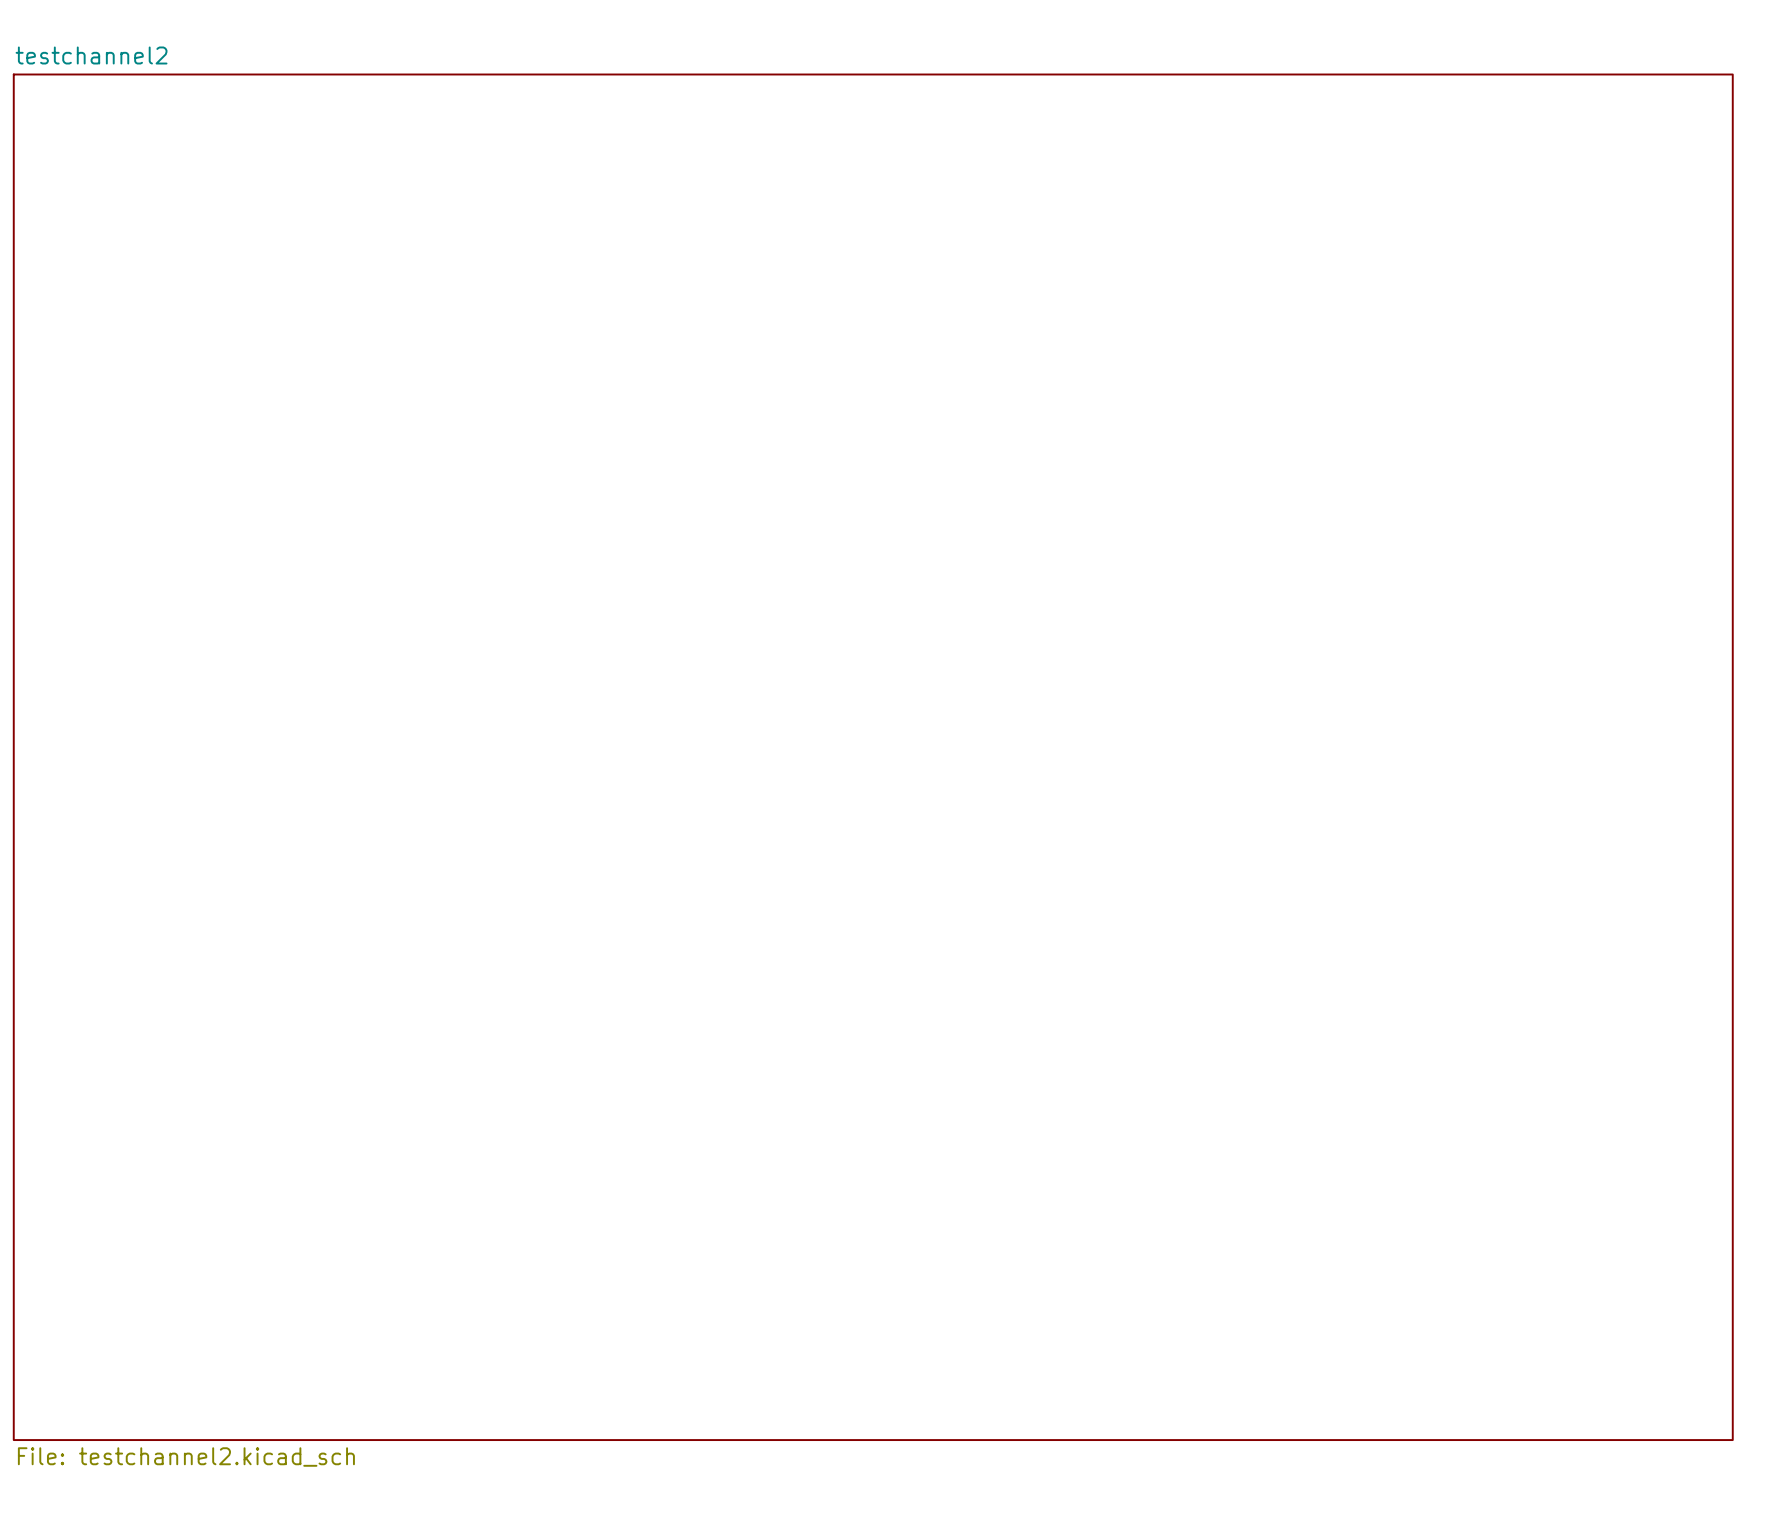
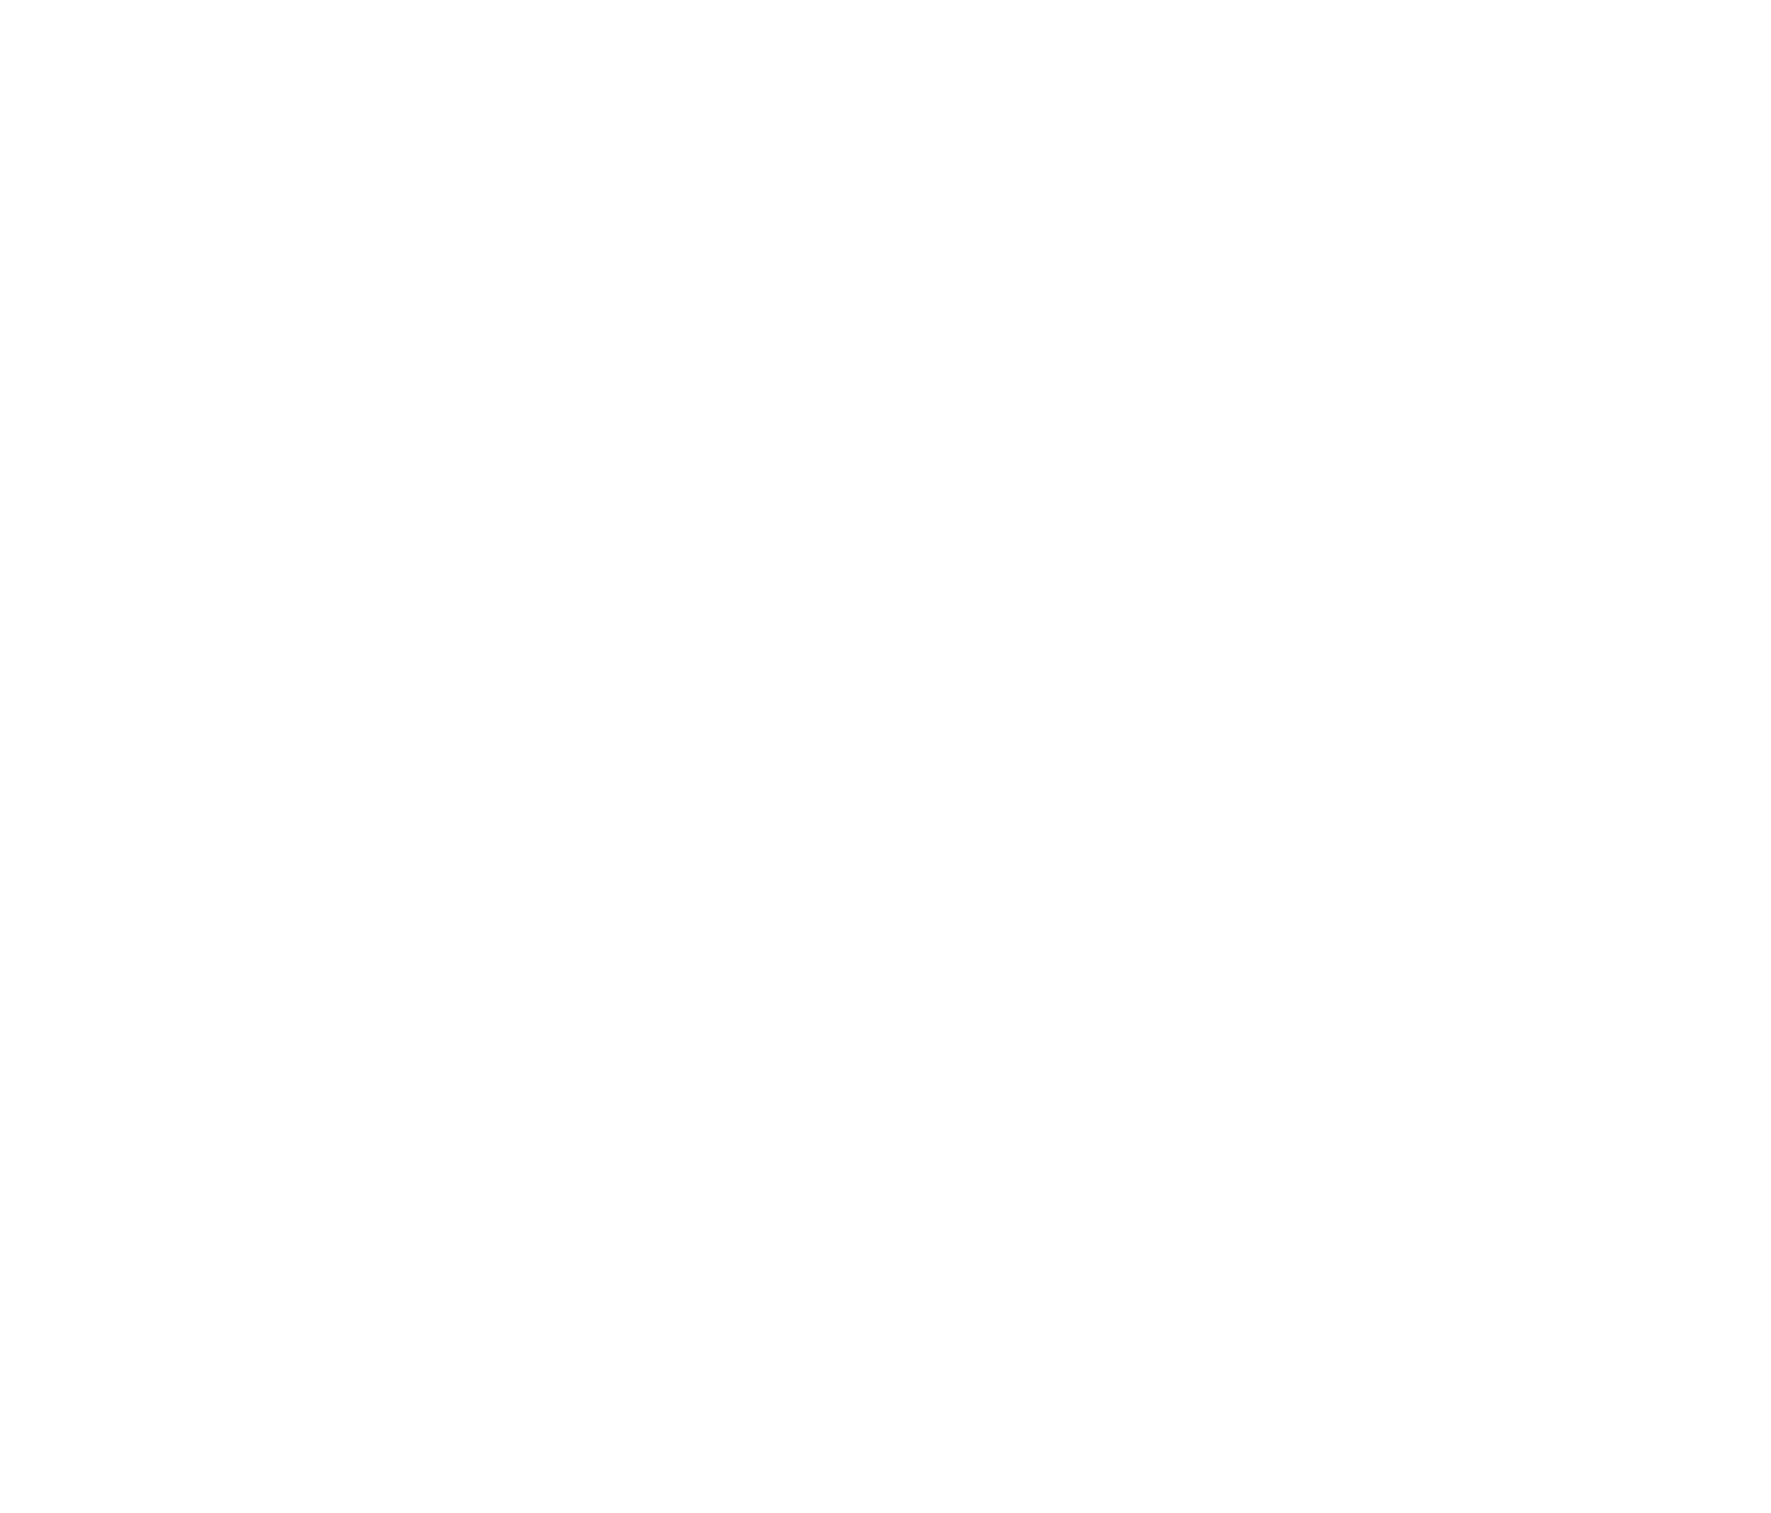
sheet testchannel2: File: testchannel2.kicad_sch (873, 757) -> none

